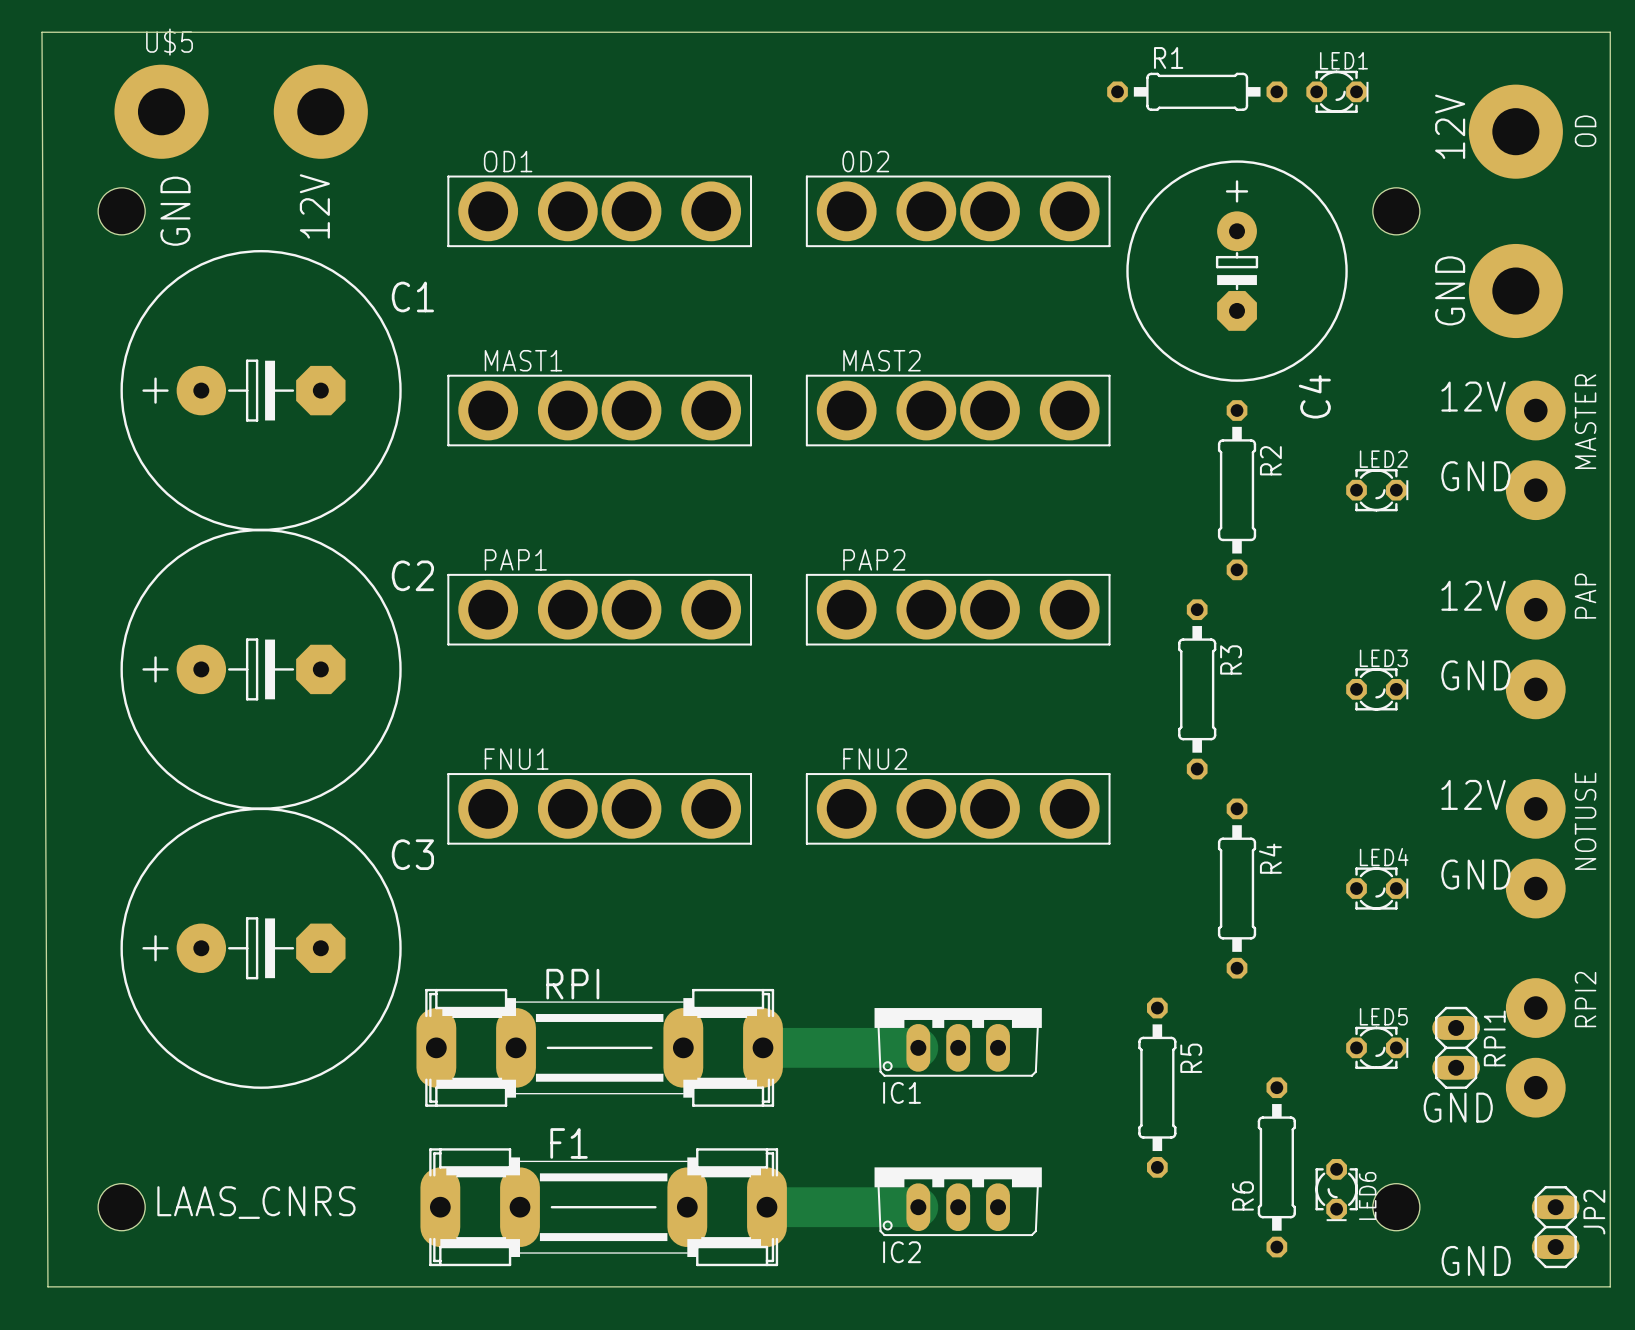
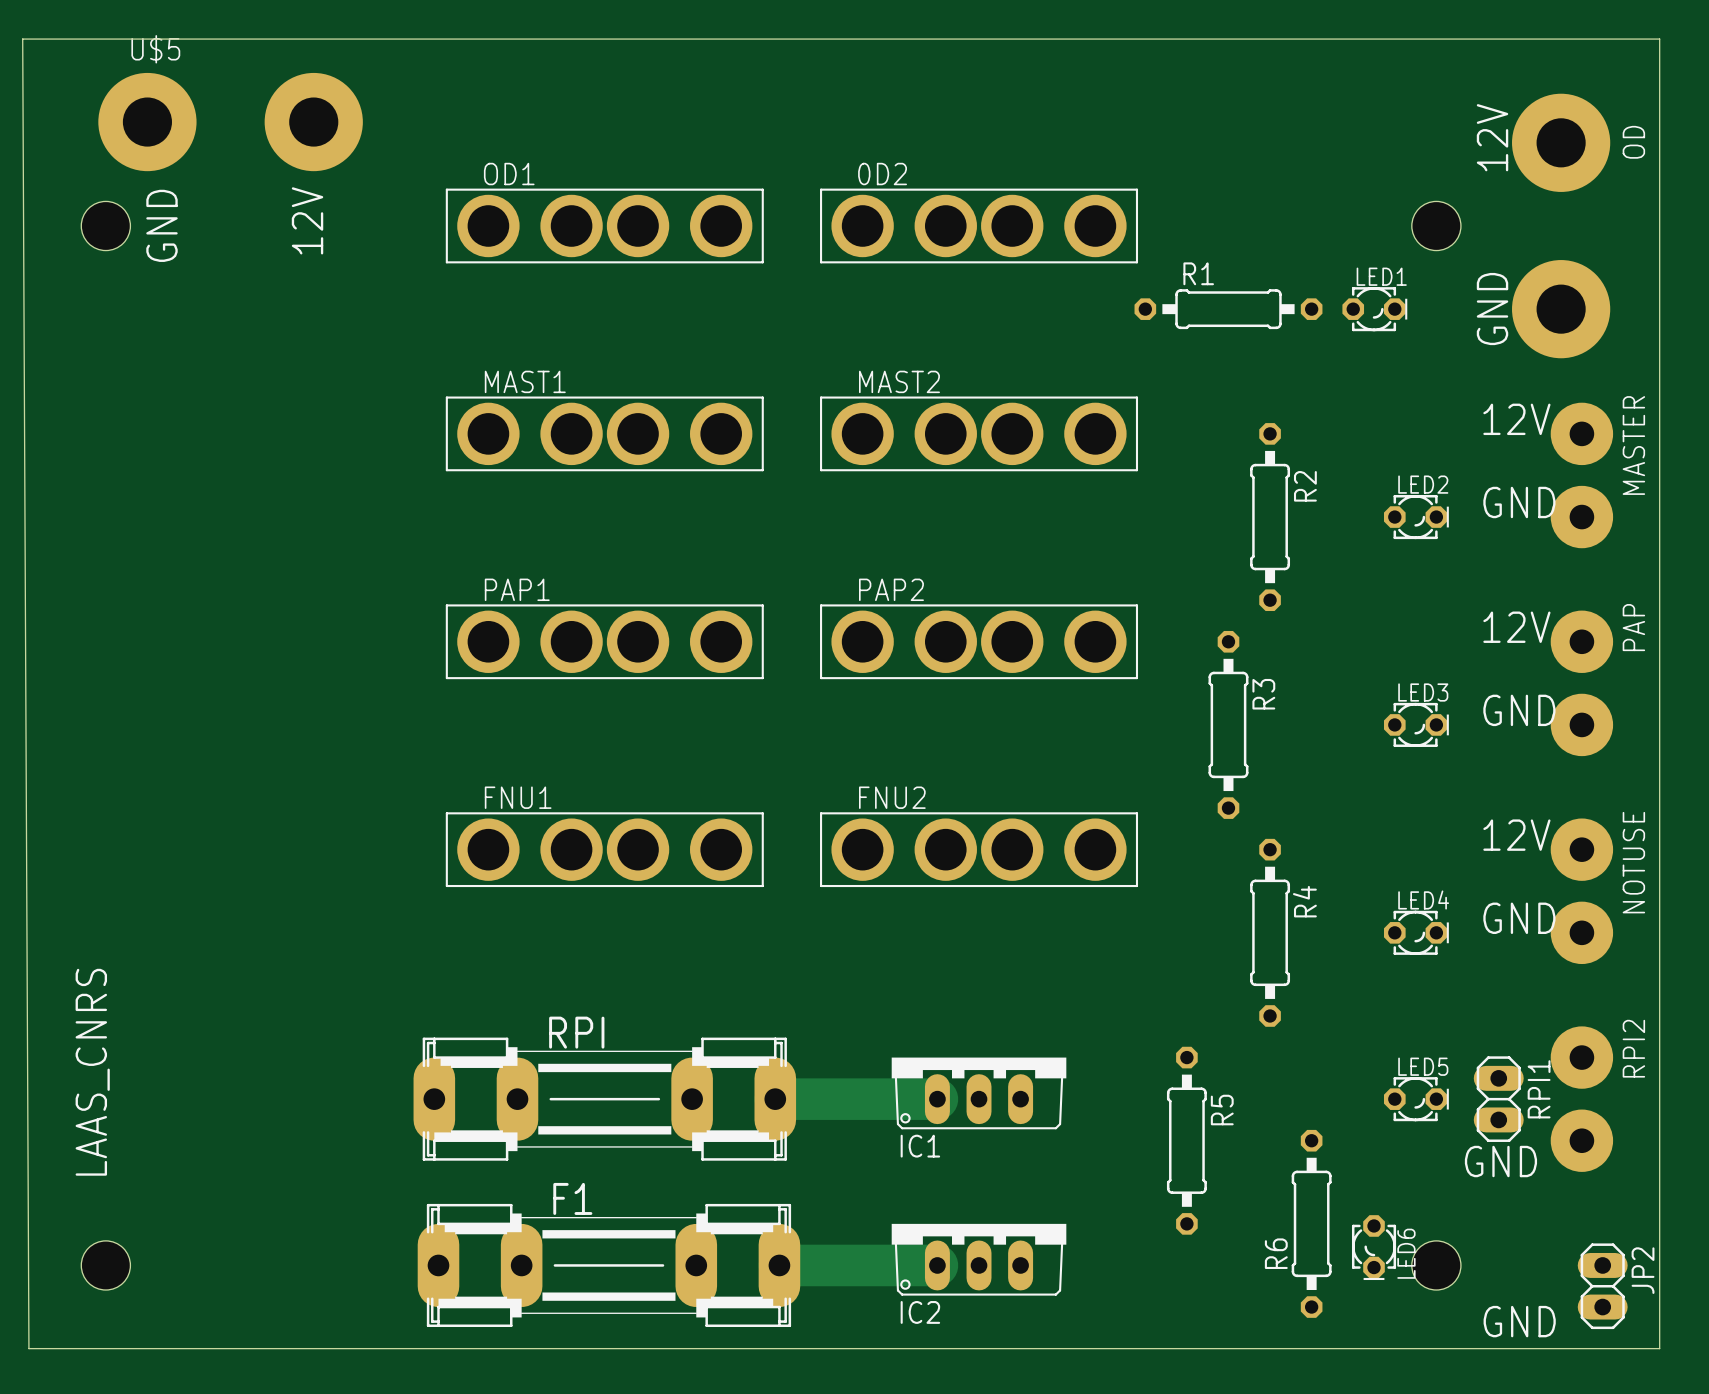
R1 position: (1197, 91) -> (1228, 309)
LED1 position: (1337, 91) -> (1374, 309)
C4: (1237, 271) -> none
C1: (261, 390) -> none
C2: (261, 669) -> none
C3: (261, 948) -> none
text rotation: 0° (256, 1202) -> 90° counterclockwise (92, 1072)

